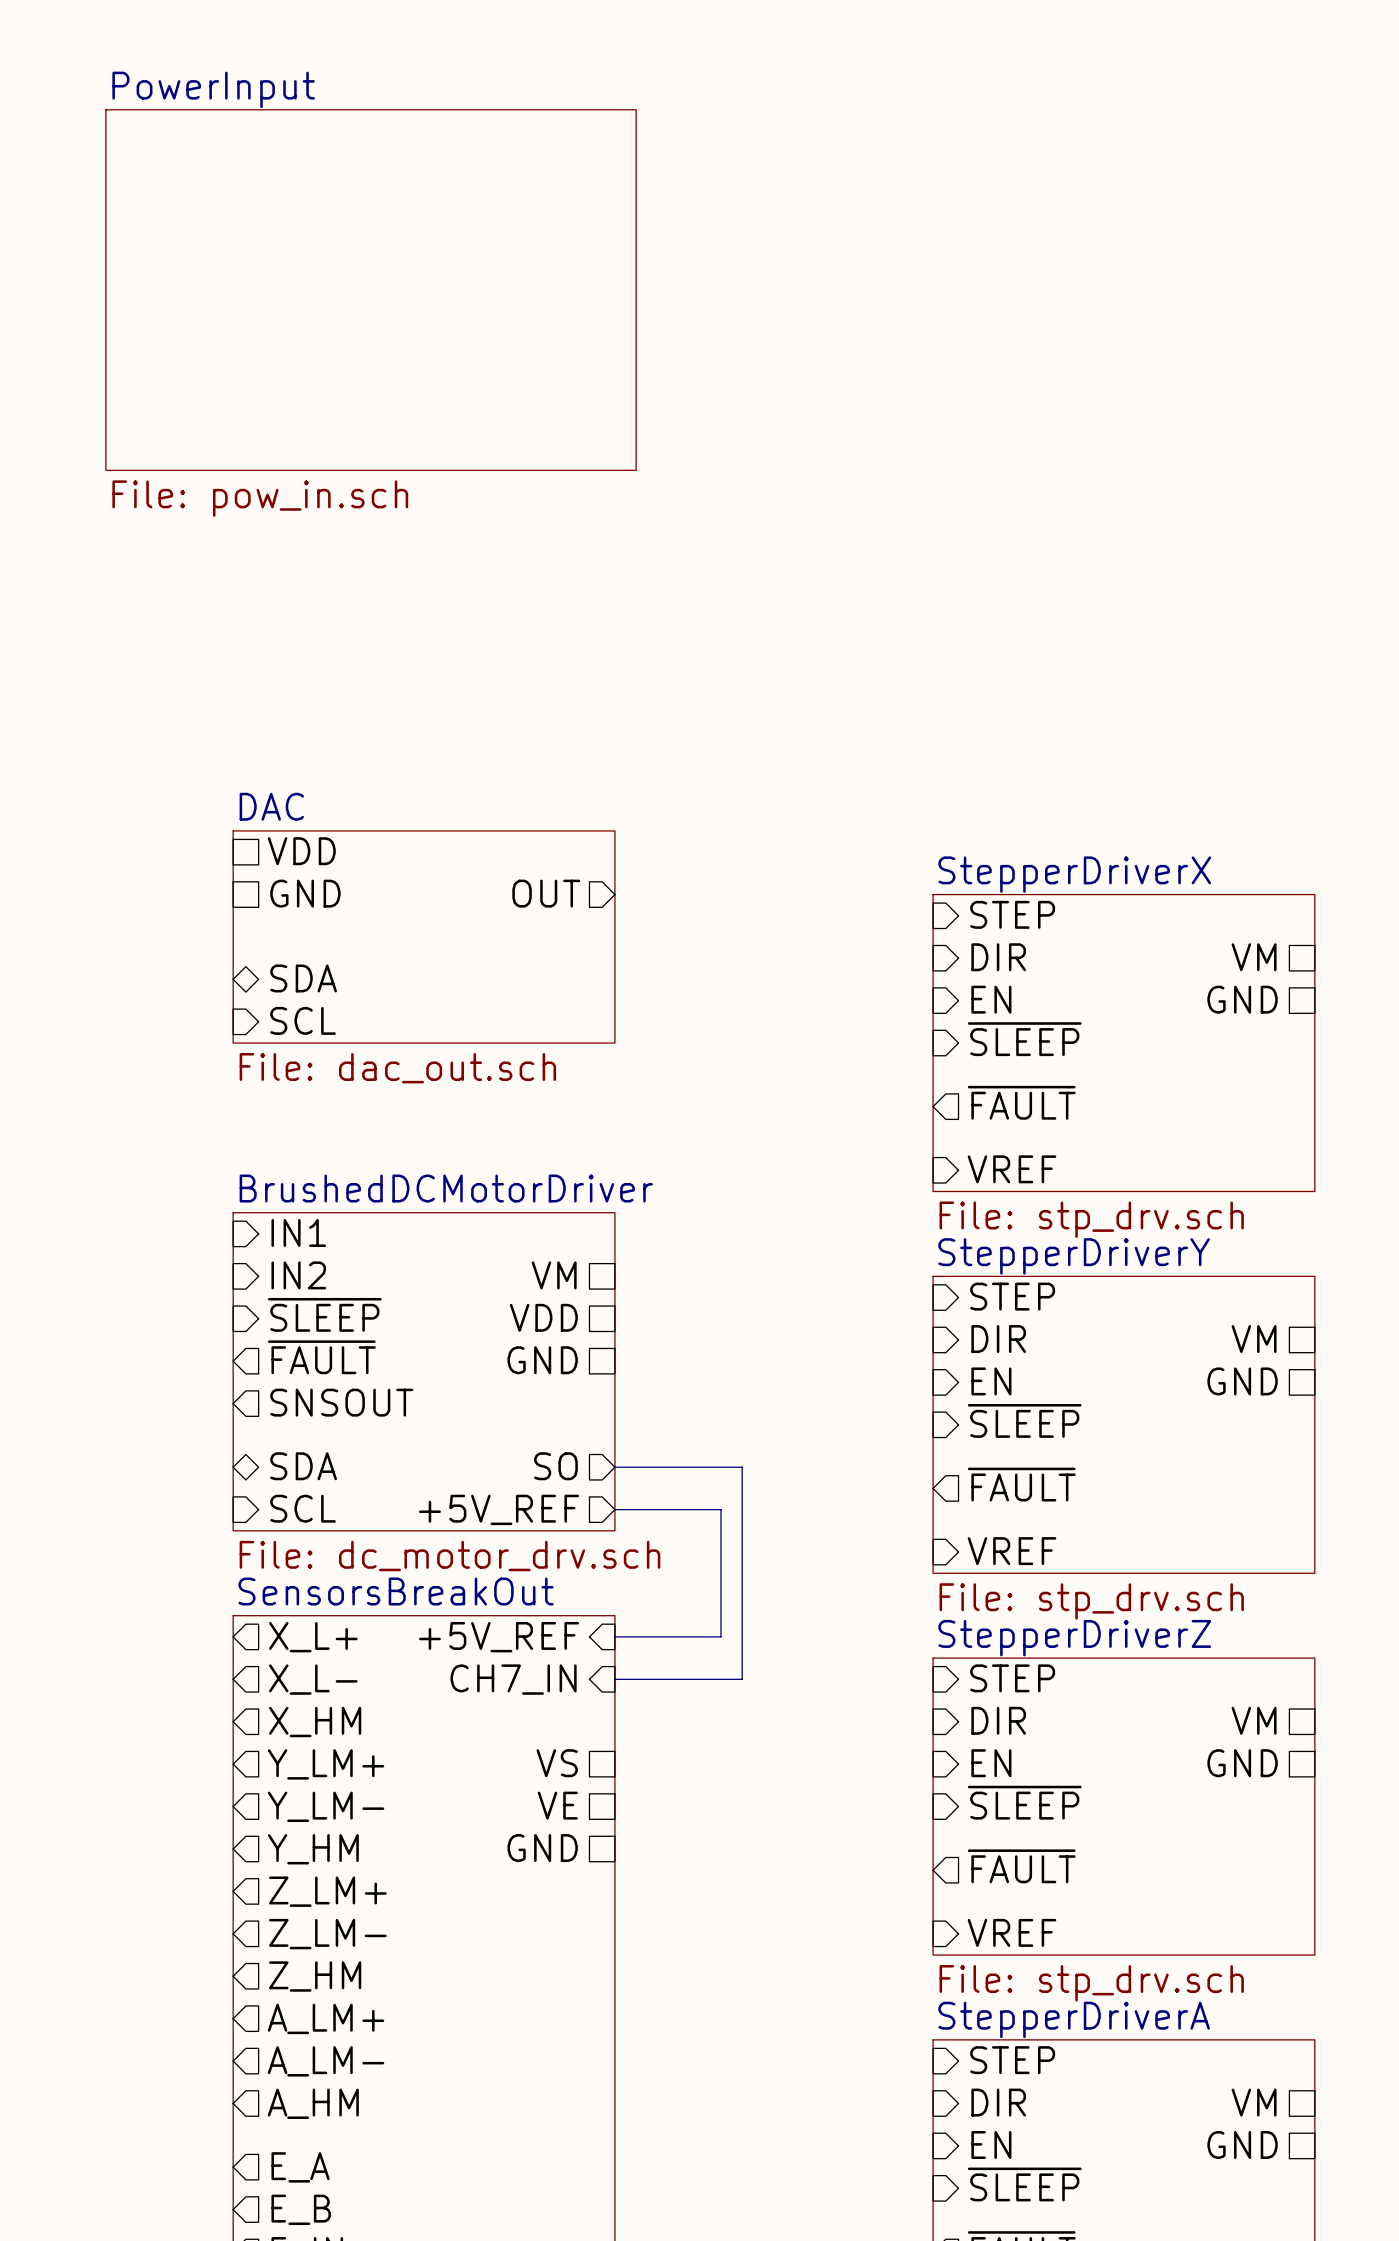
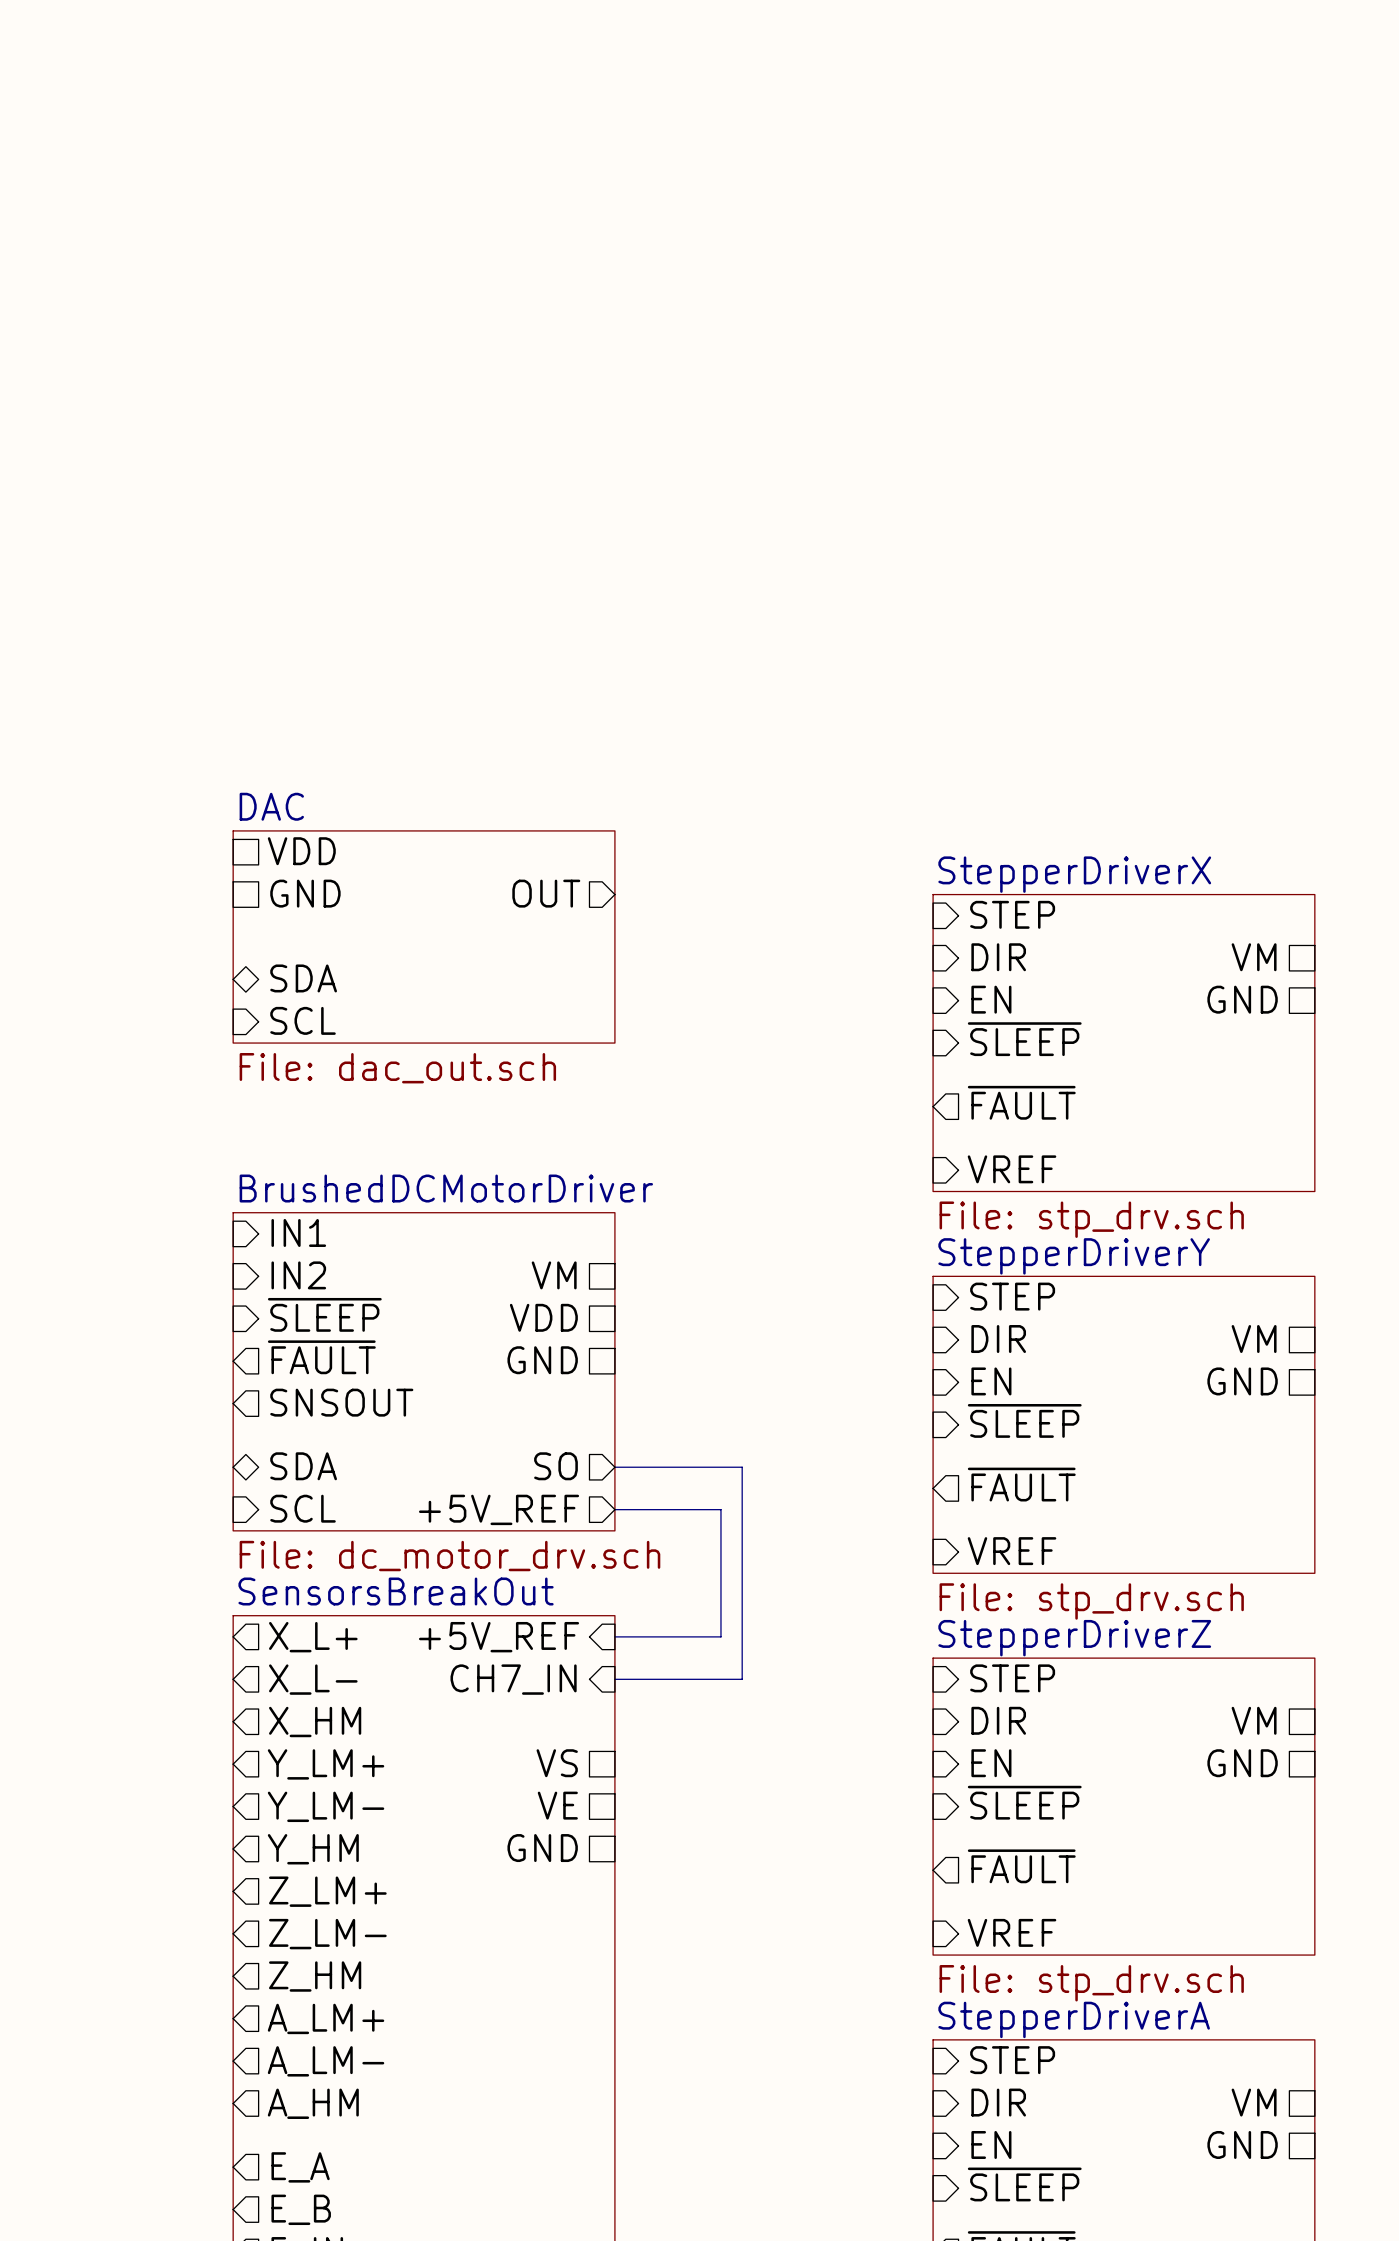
sheet PowerInput: File: pow_in.sch (371, 290) -> none

